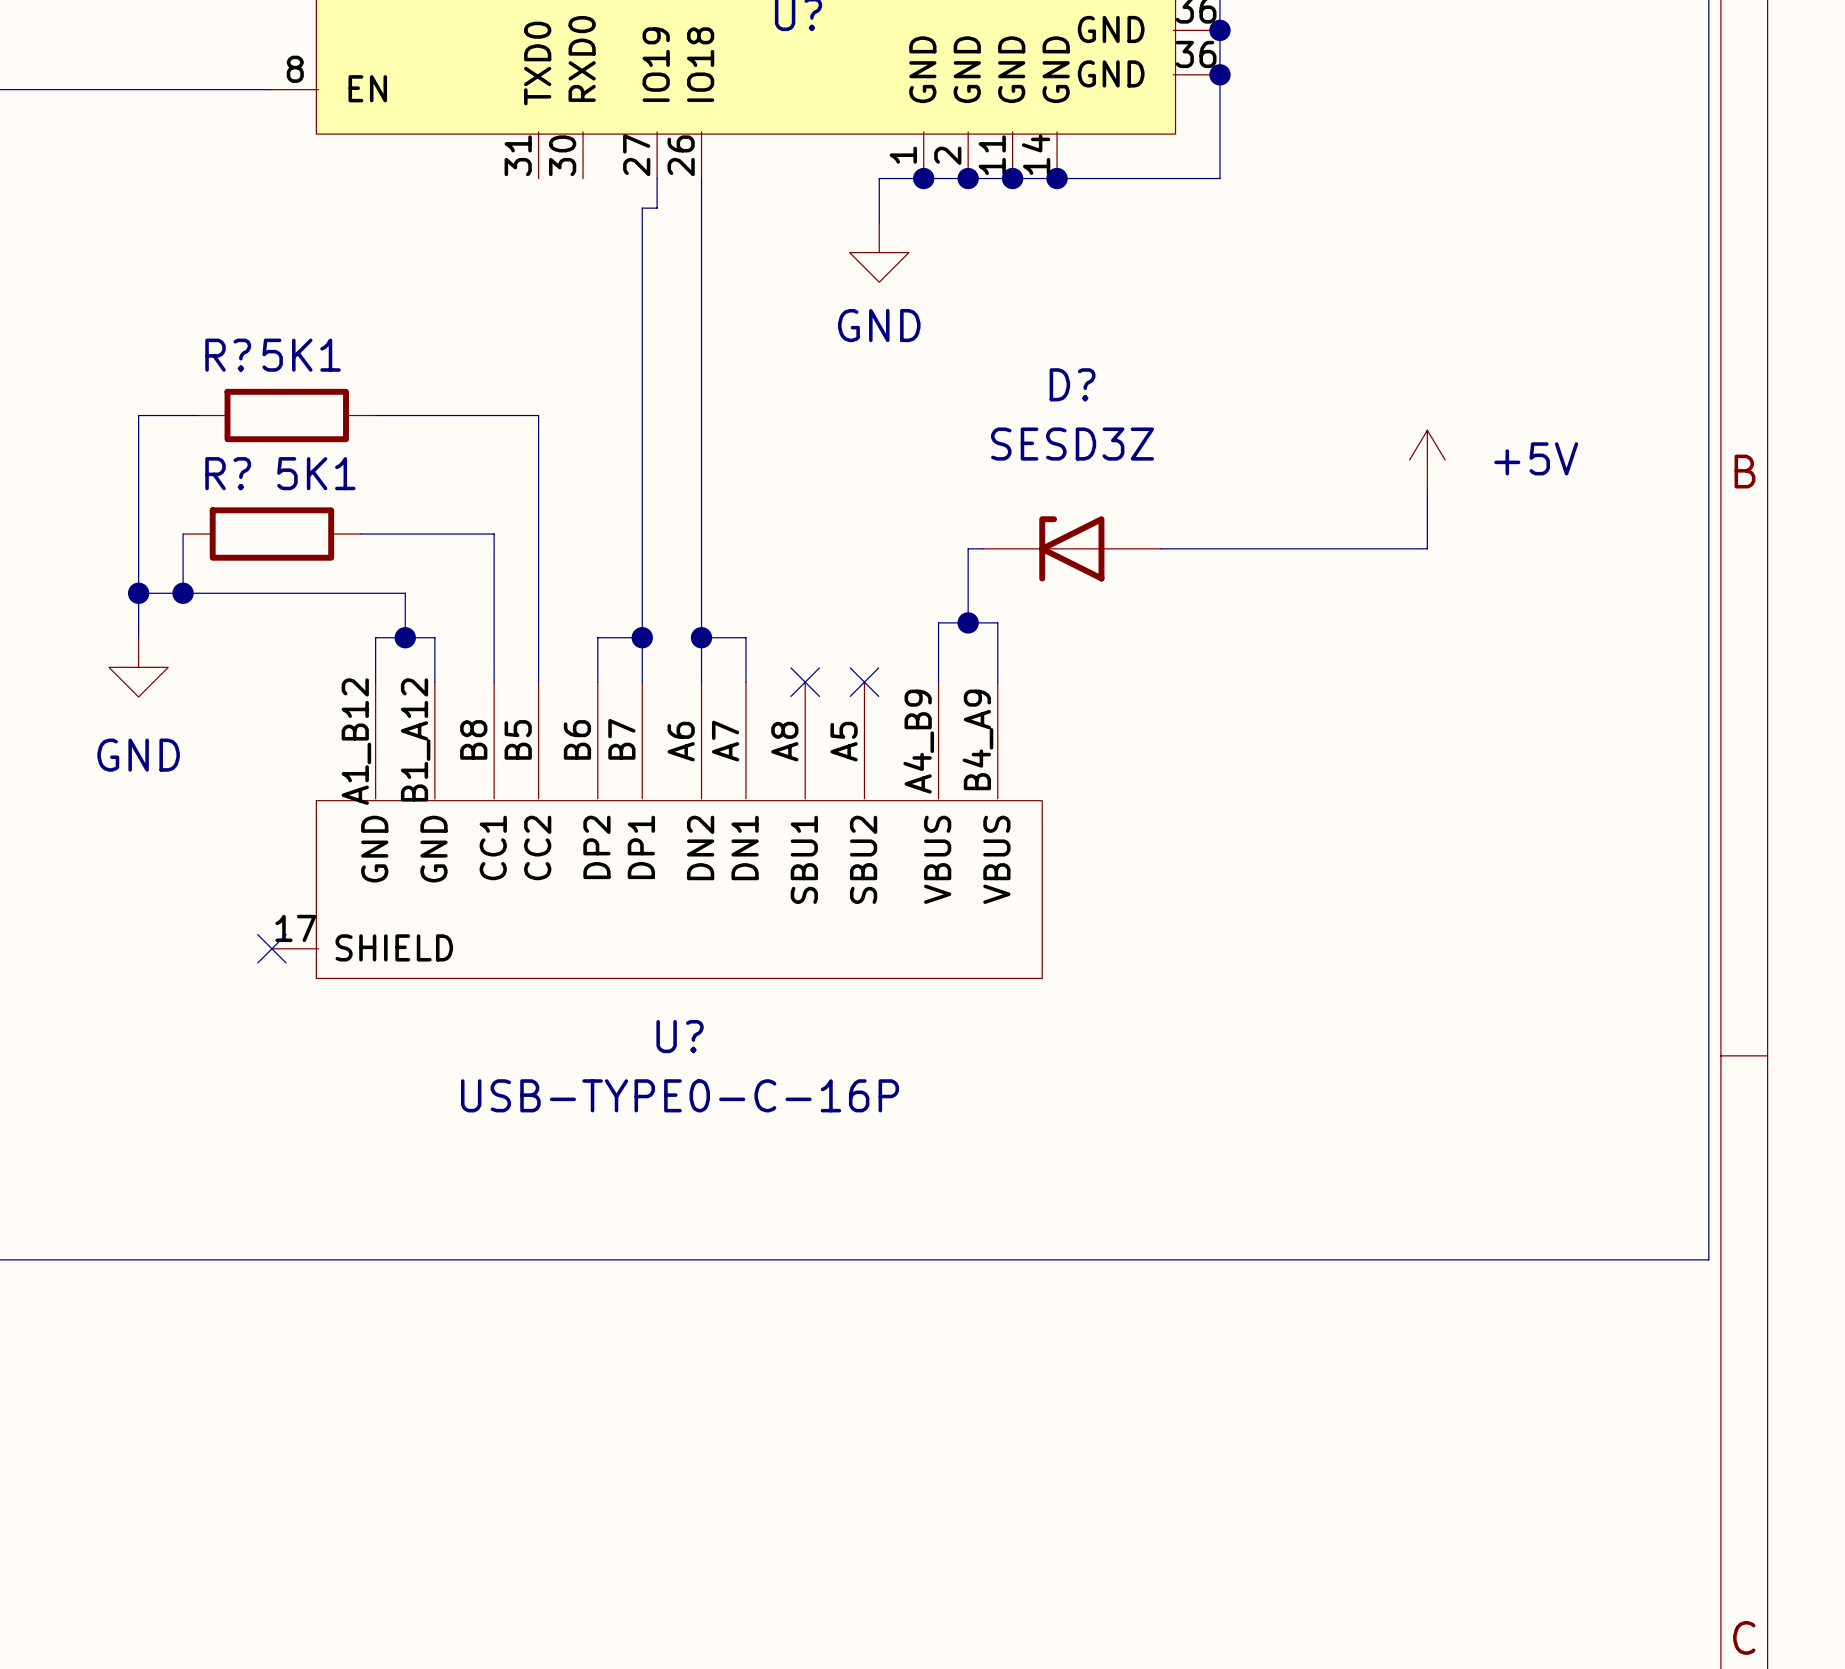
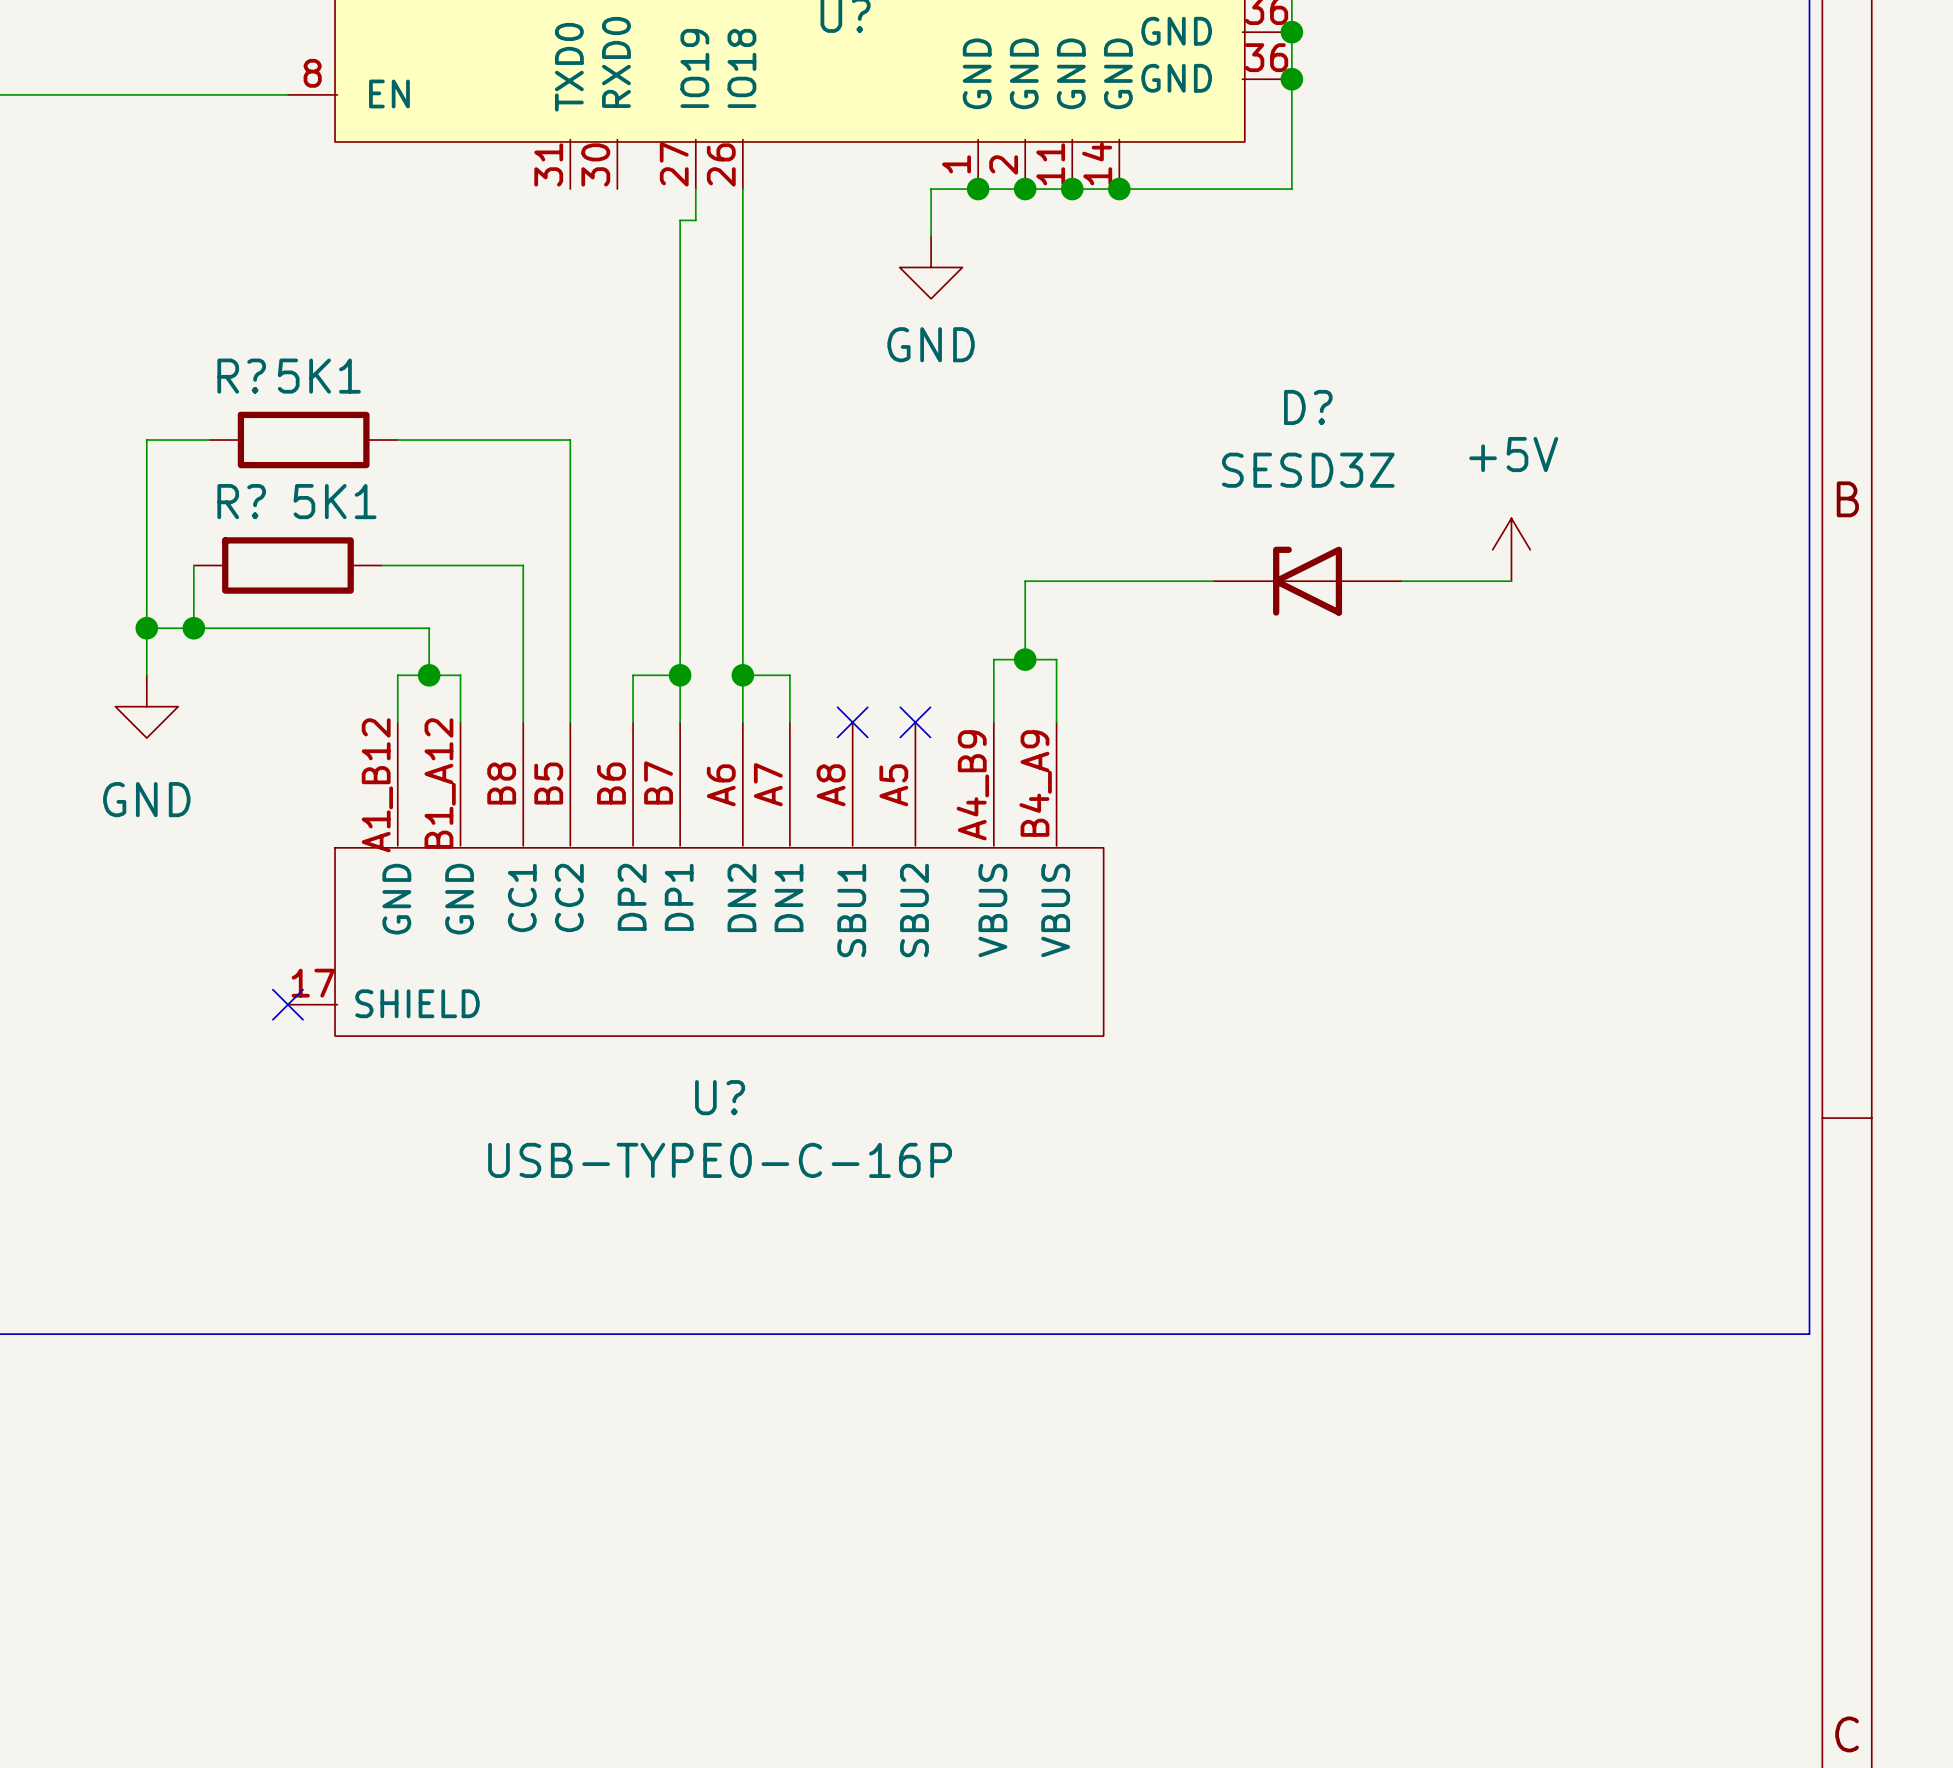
power symbol text position: +5V (1536, 458) -> +5V (1513, 454)
power symbol position: +5V (1427, 459) -> +5V (1511, 549)
D? position: (1071, 548) -> (1307, 581)

